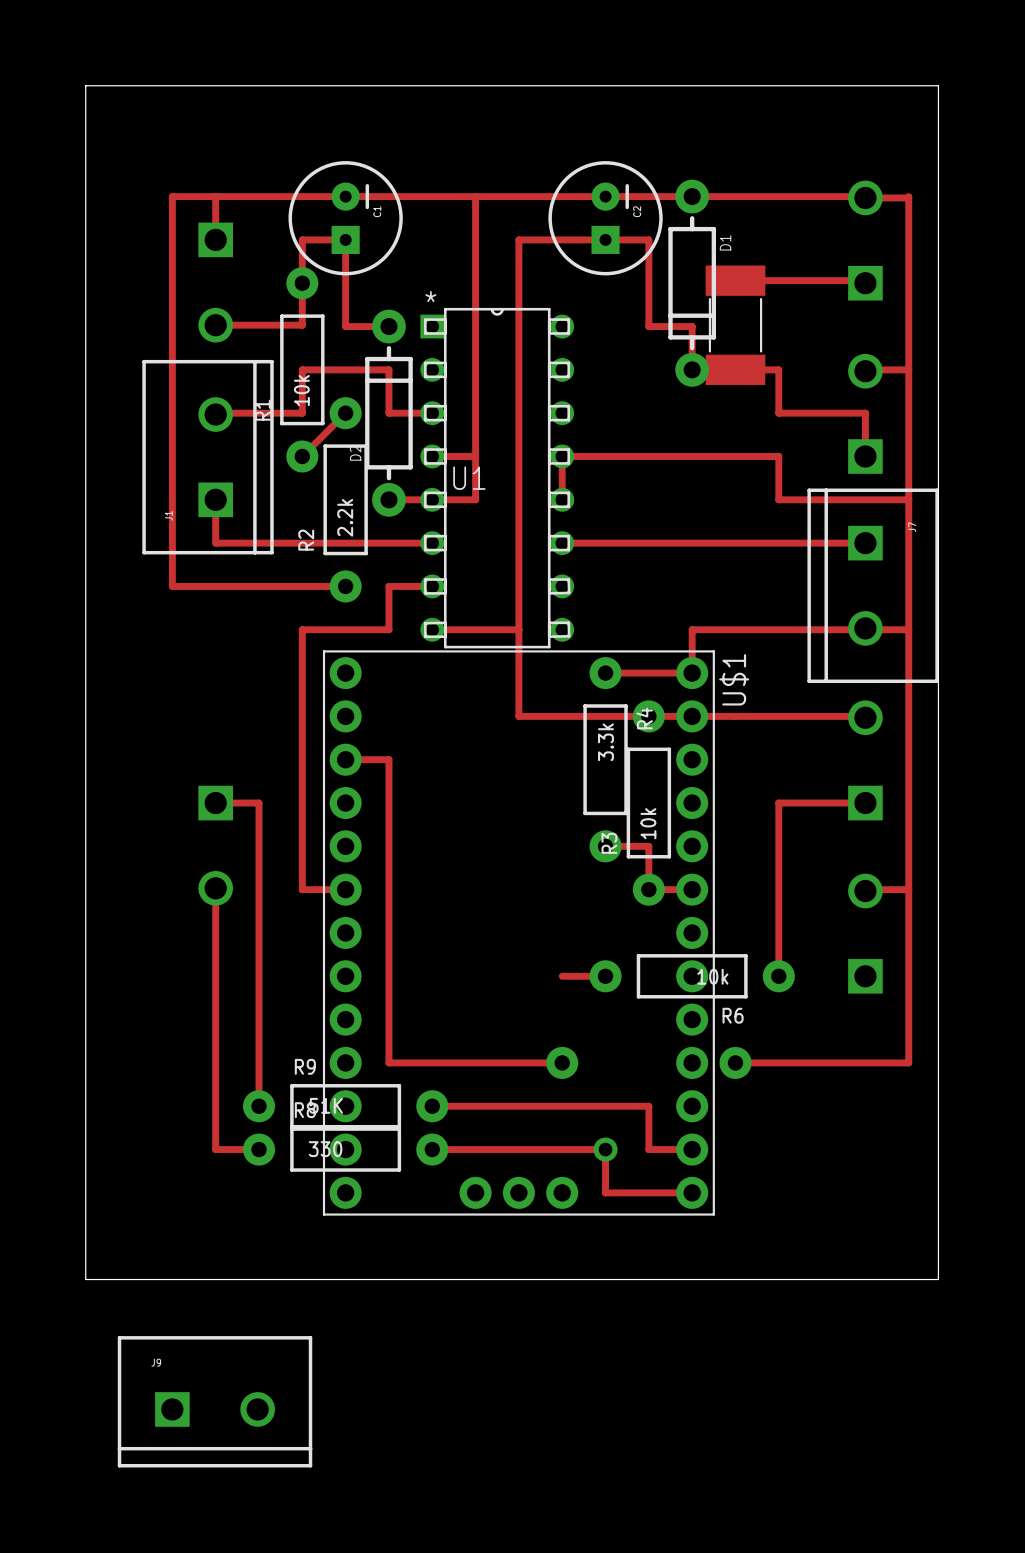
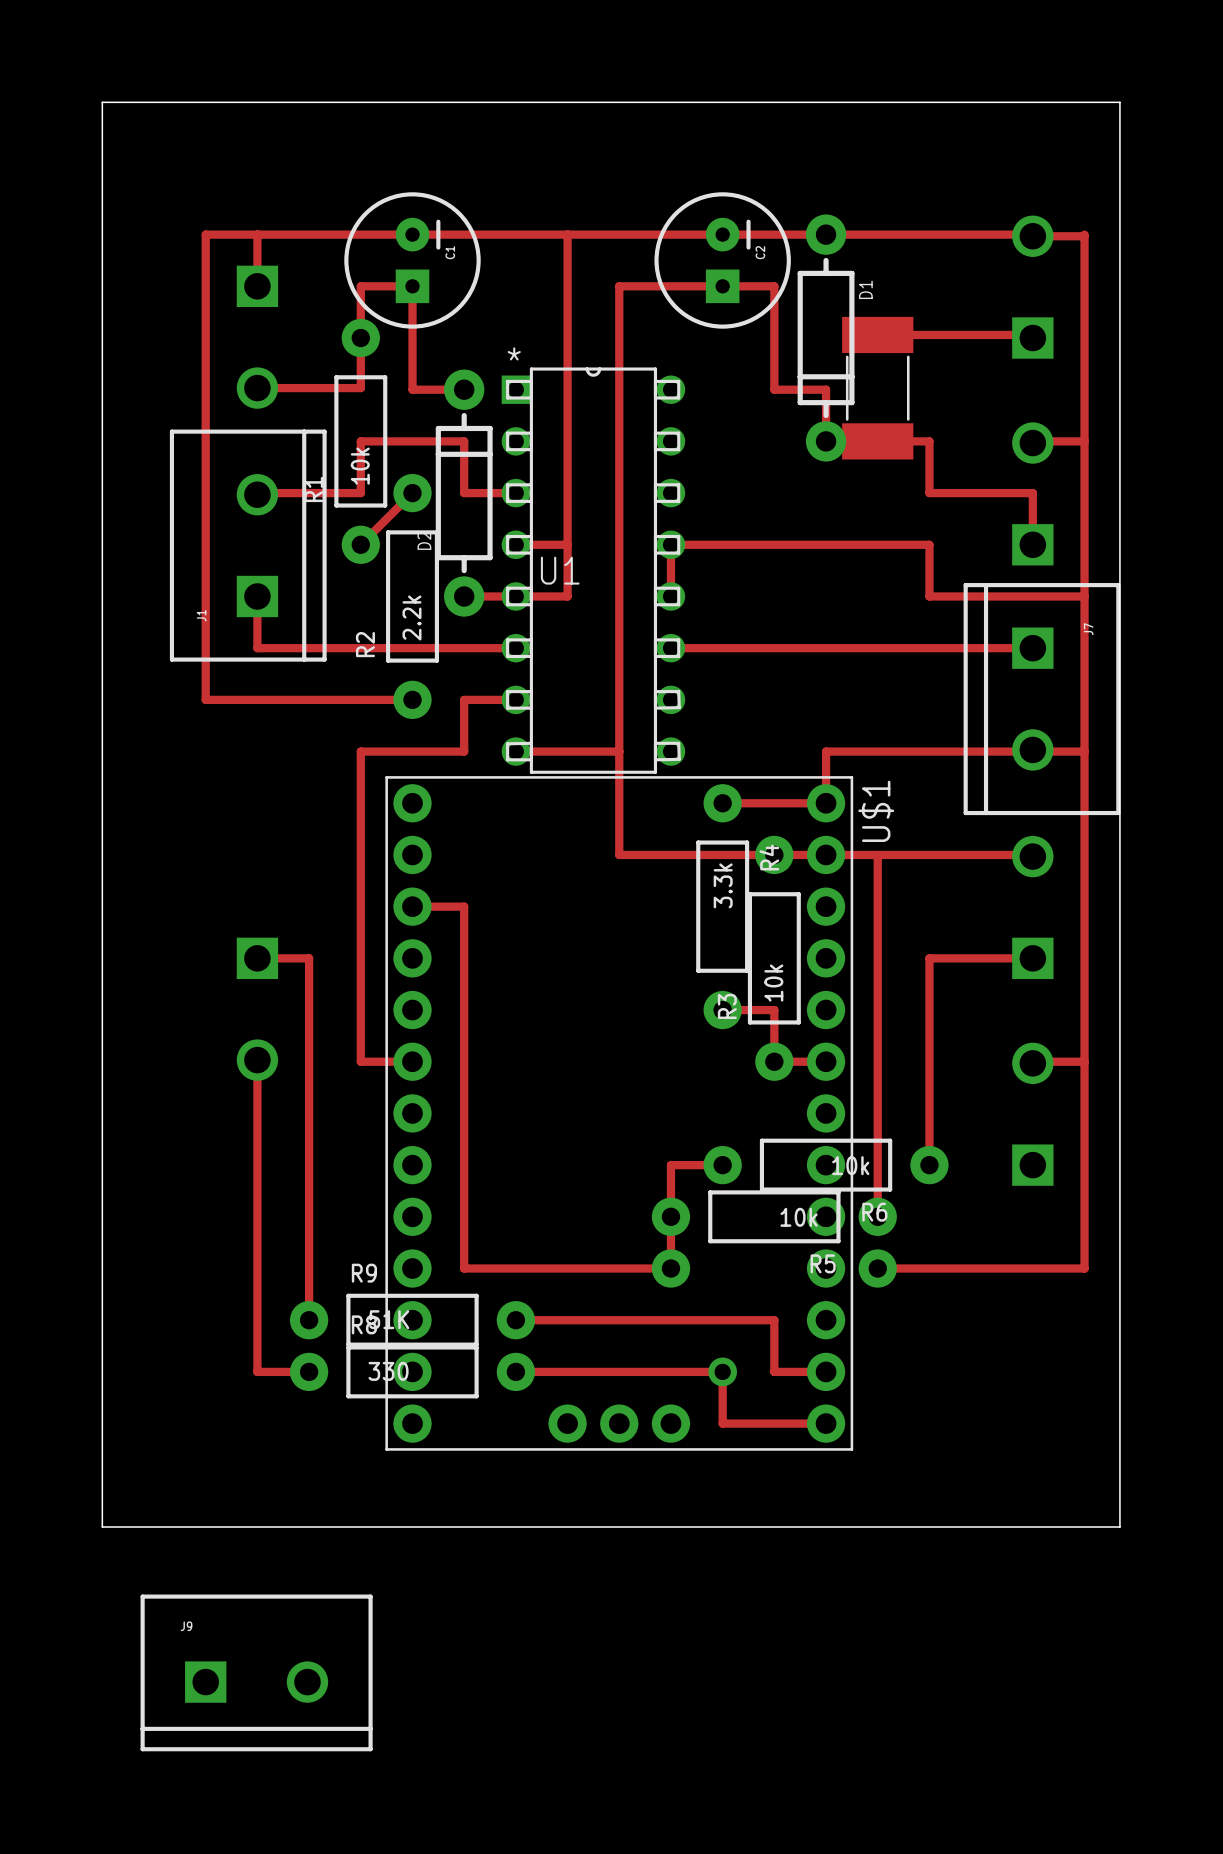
track: none -> (877, 854) (877, 1216)
track: none -> (670, 1165) (670, 1268)
R5: none -> 10k (774, 1216)

